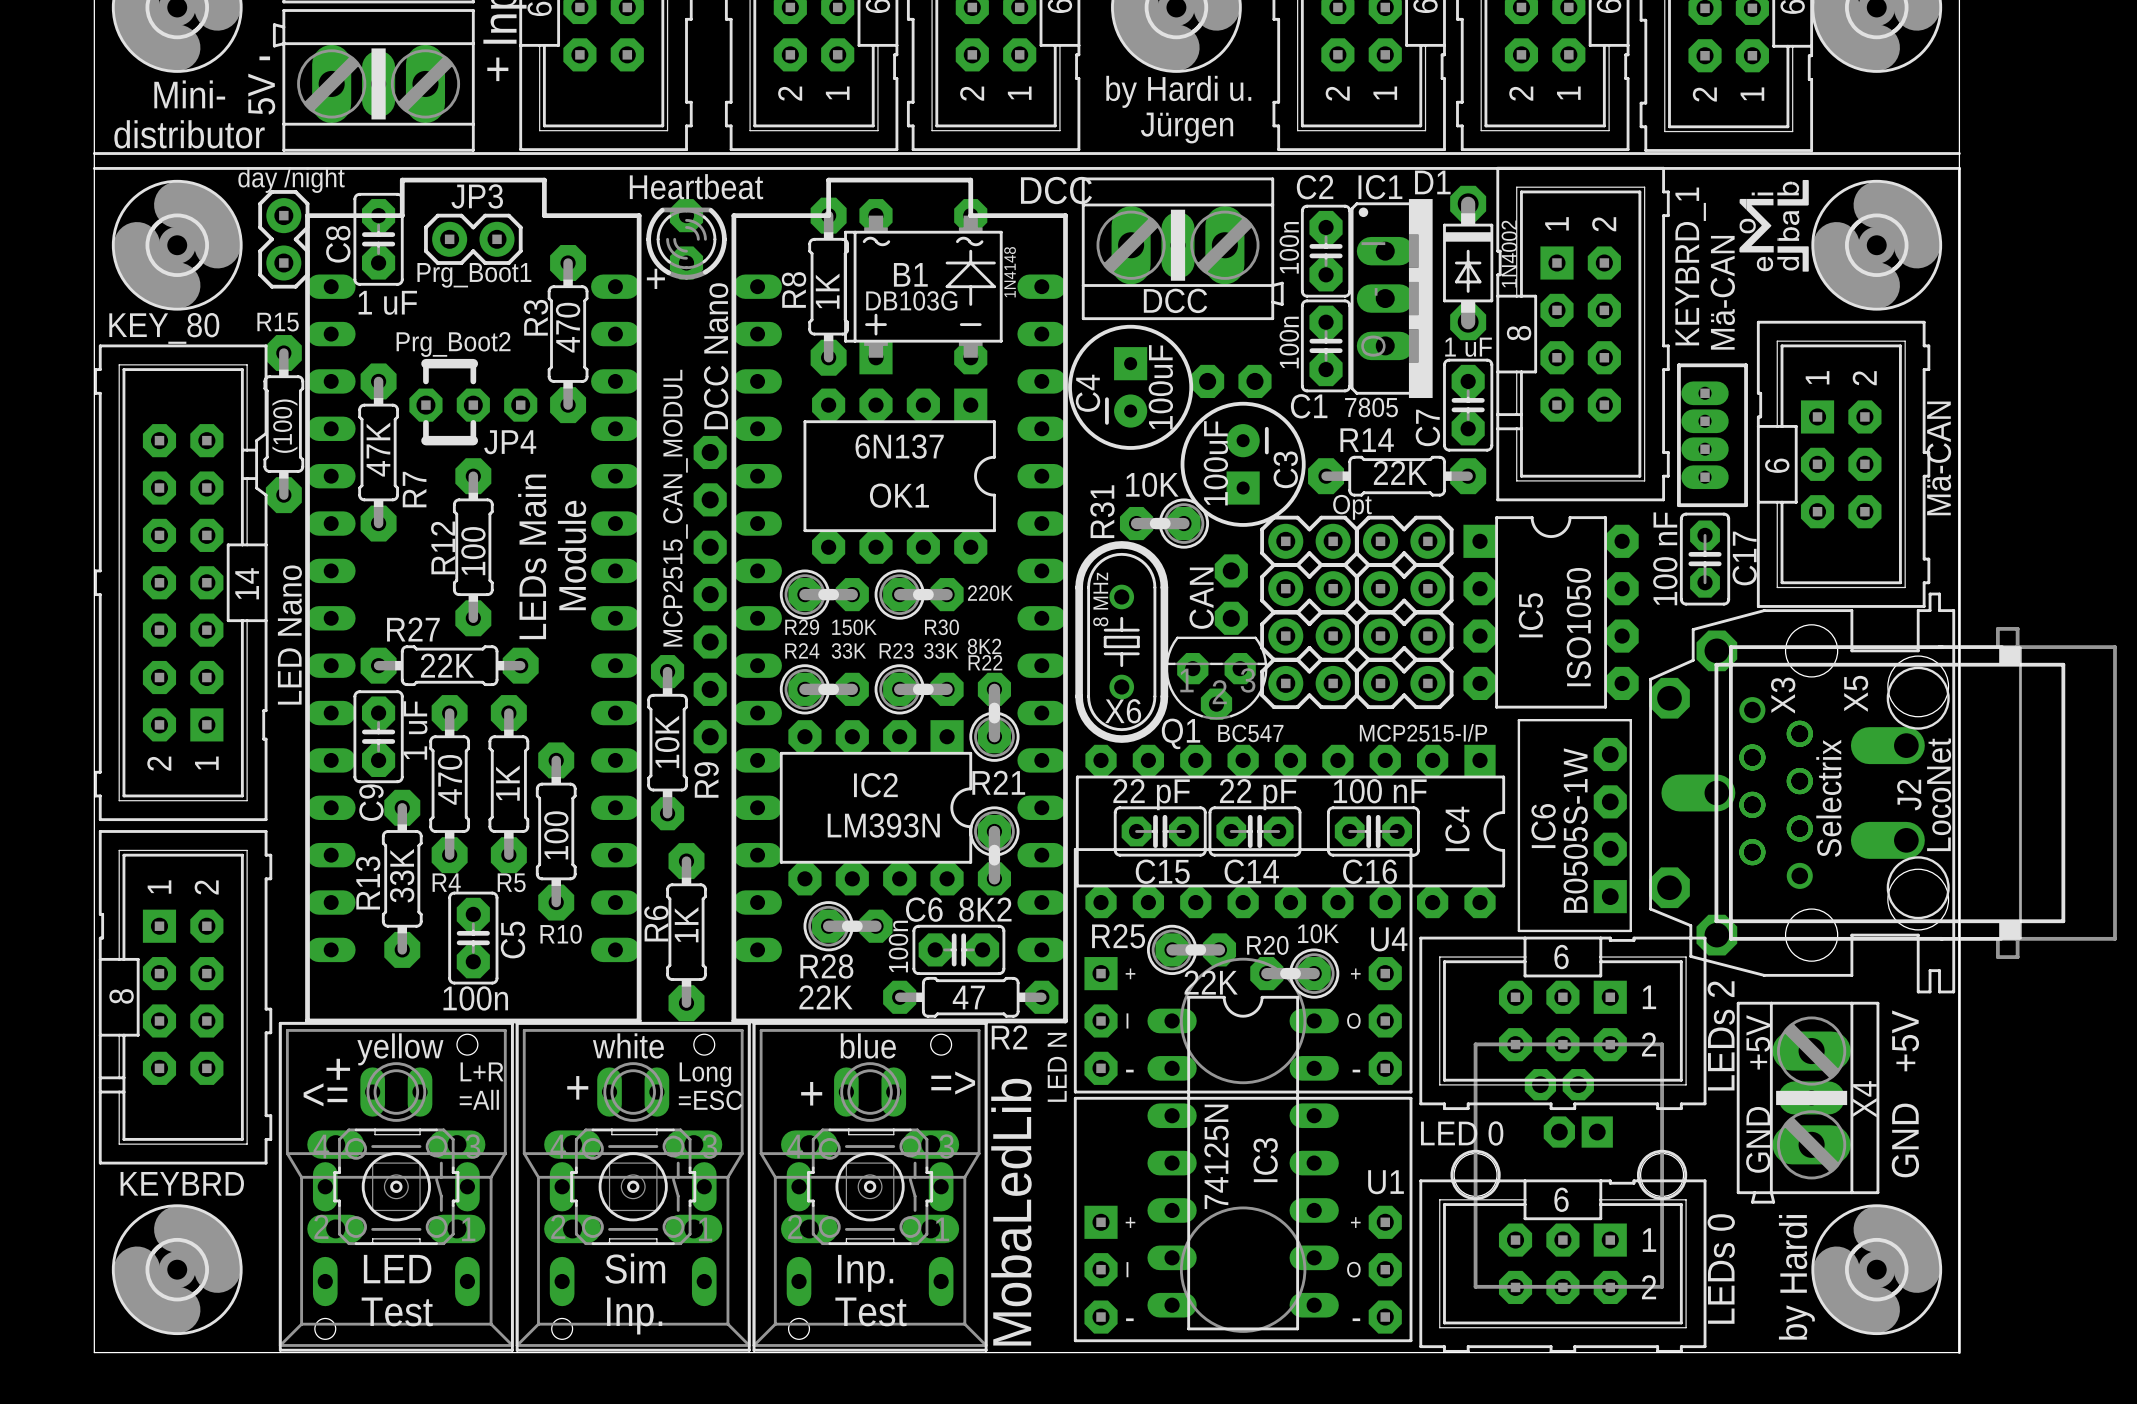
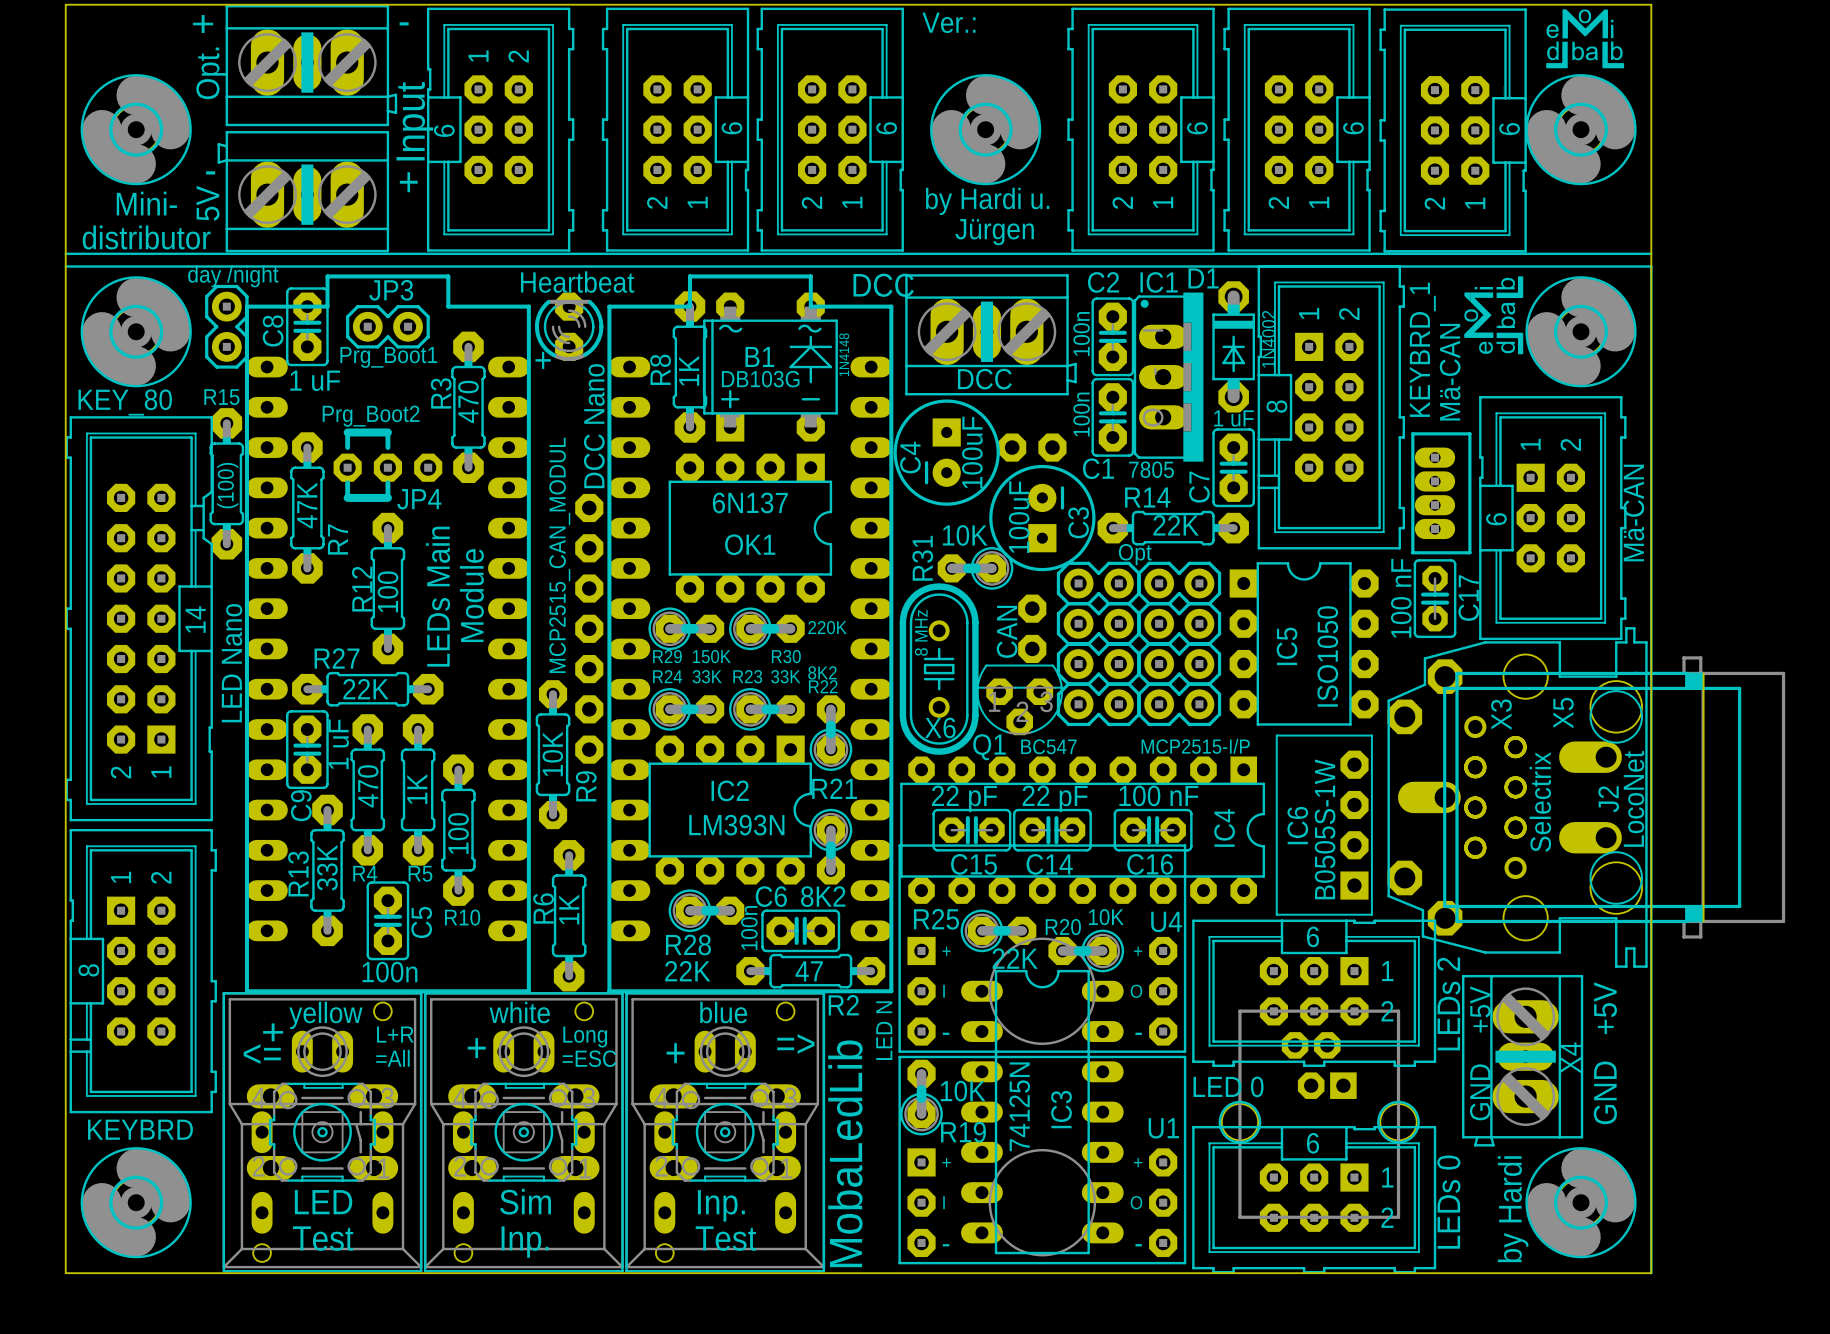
R19: none -> 10K (921, 1097)

